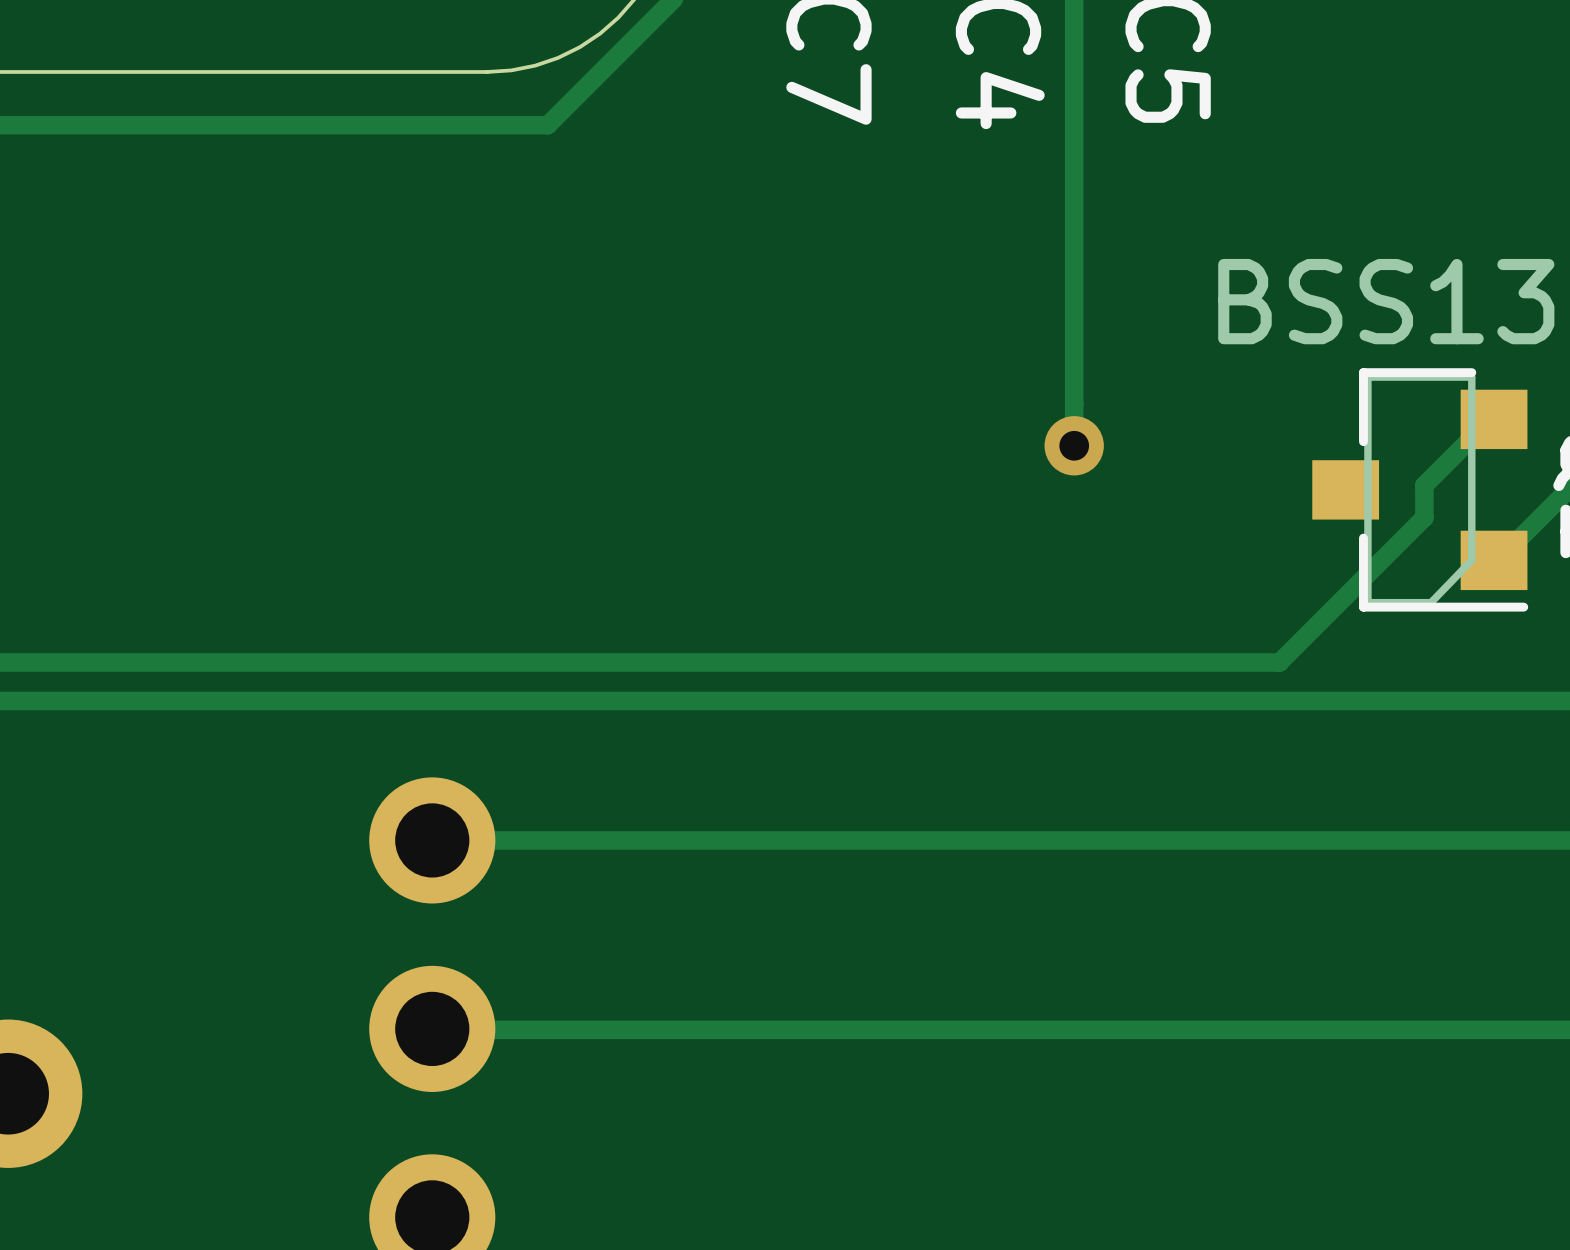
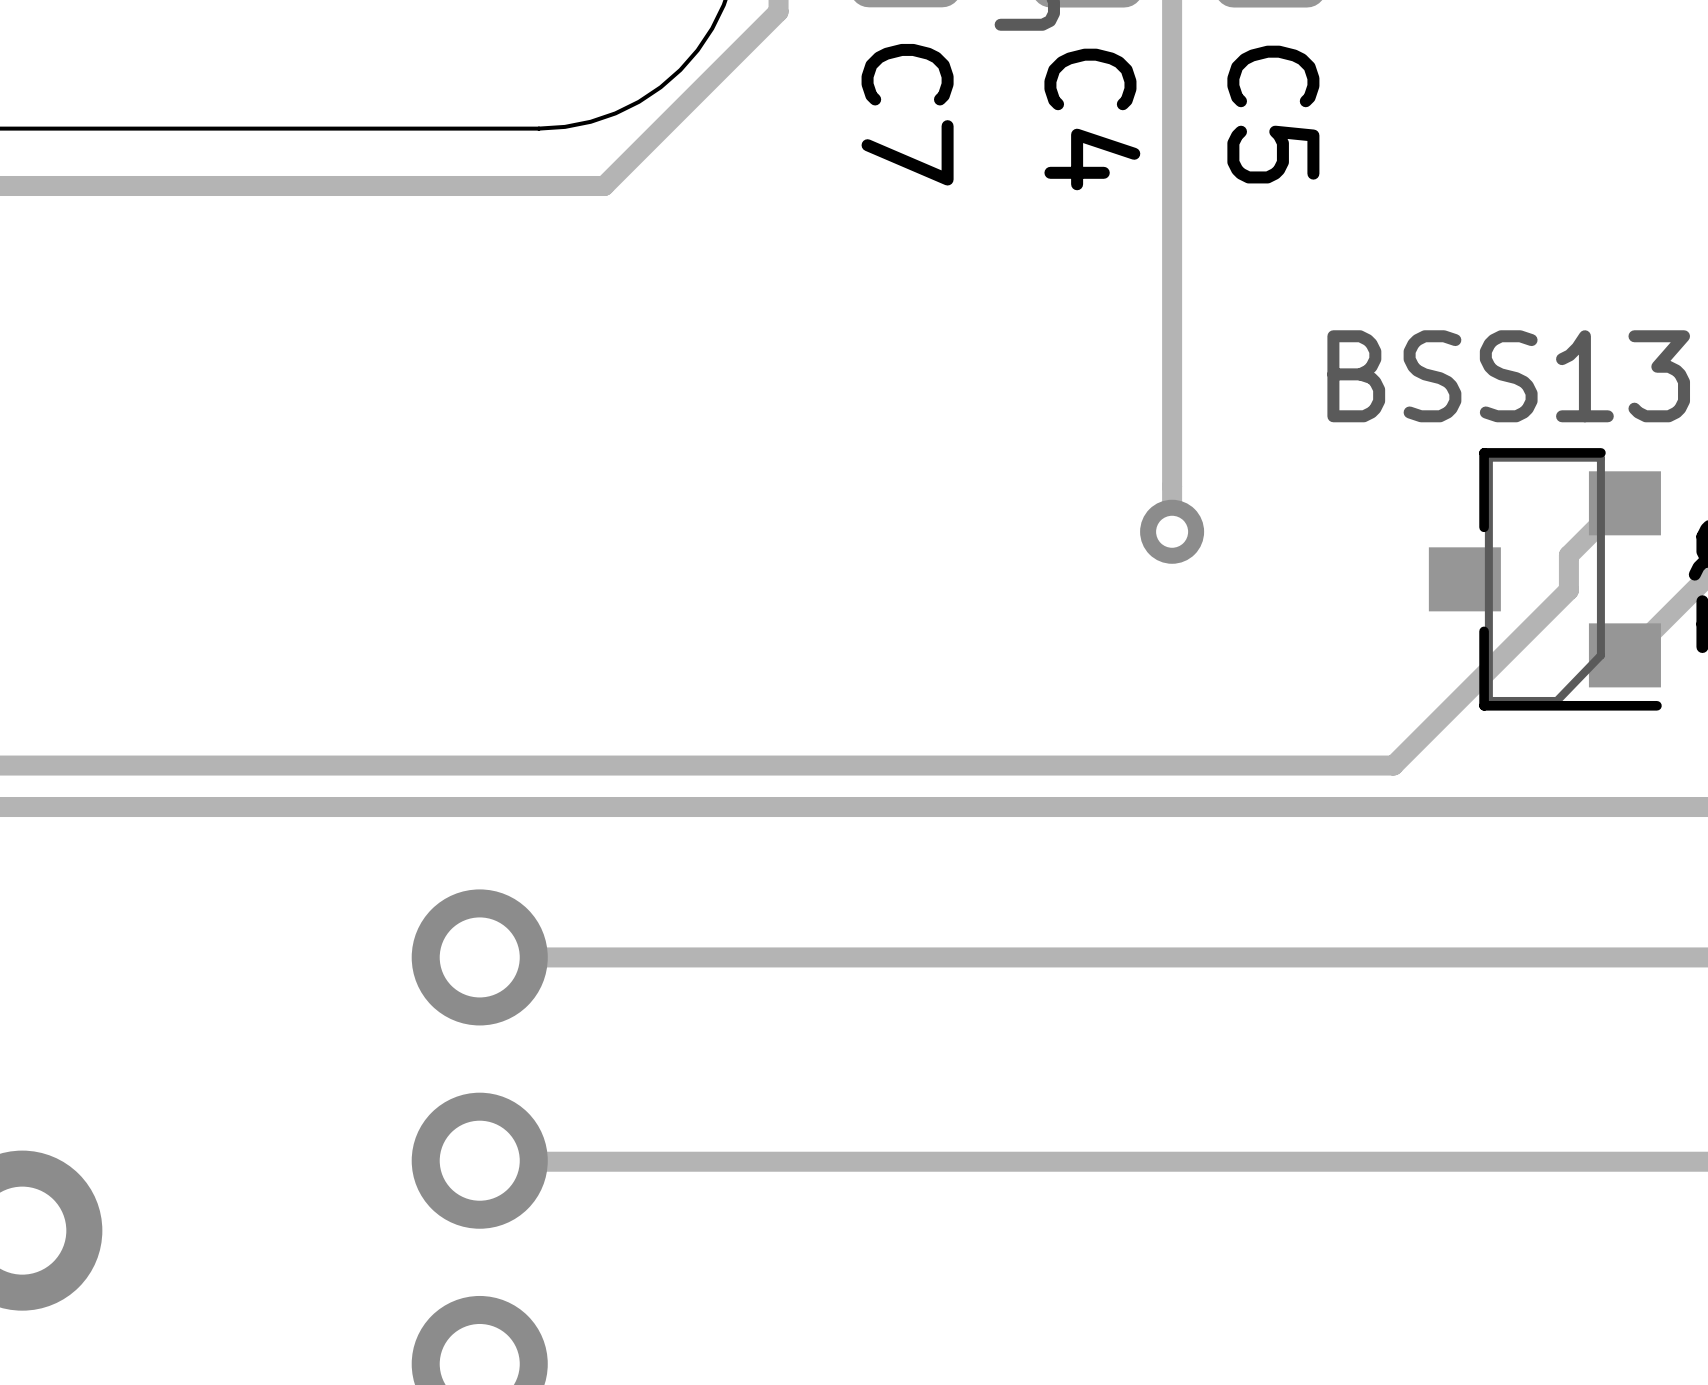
track: (1442, 467) (1424, 485) (1424, 517) -> (1568, 555) (1568, 590) (1549, 609)

